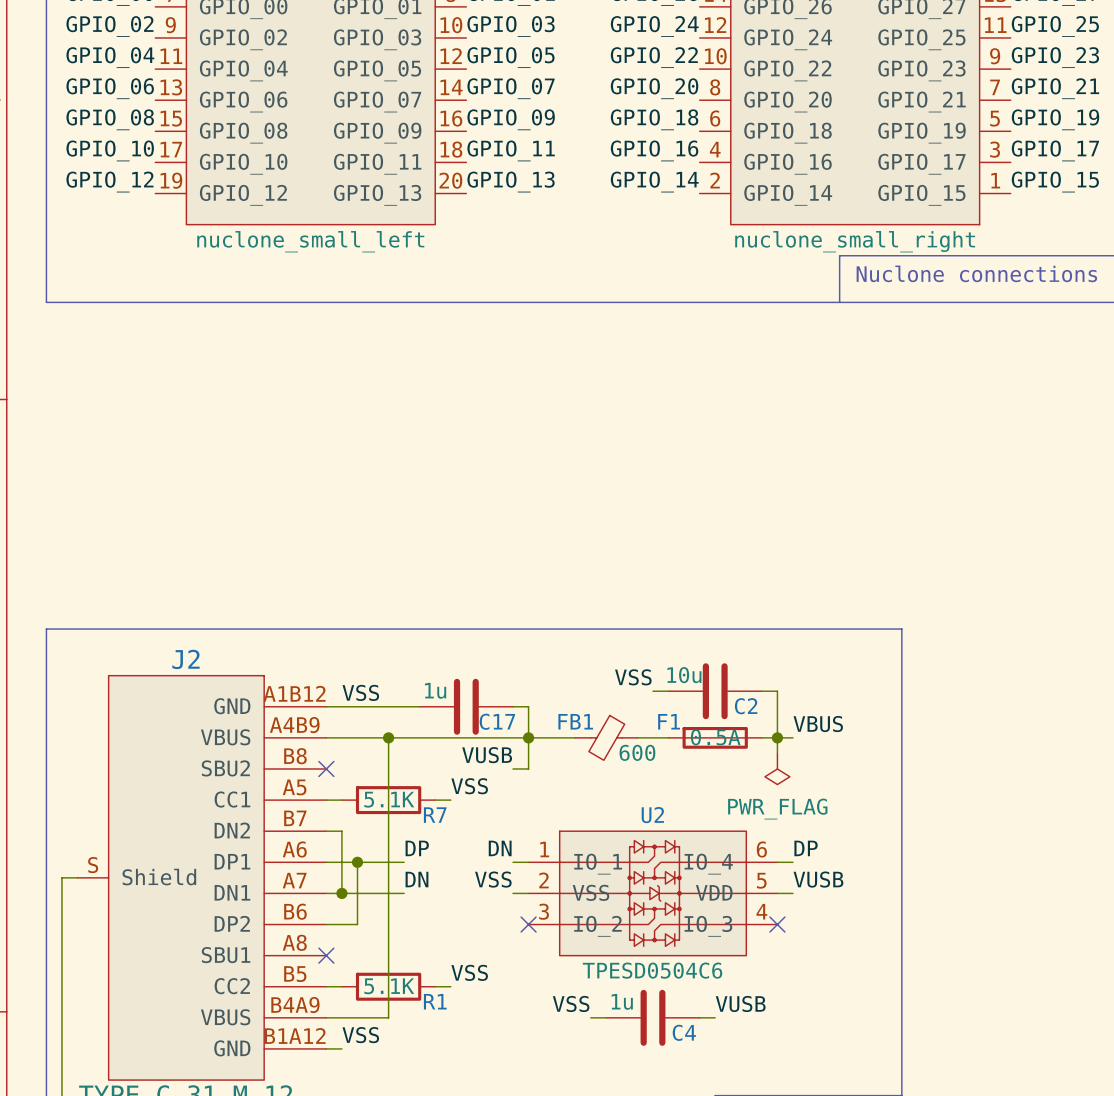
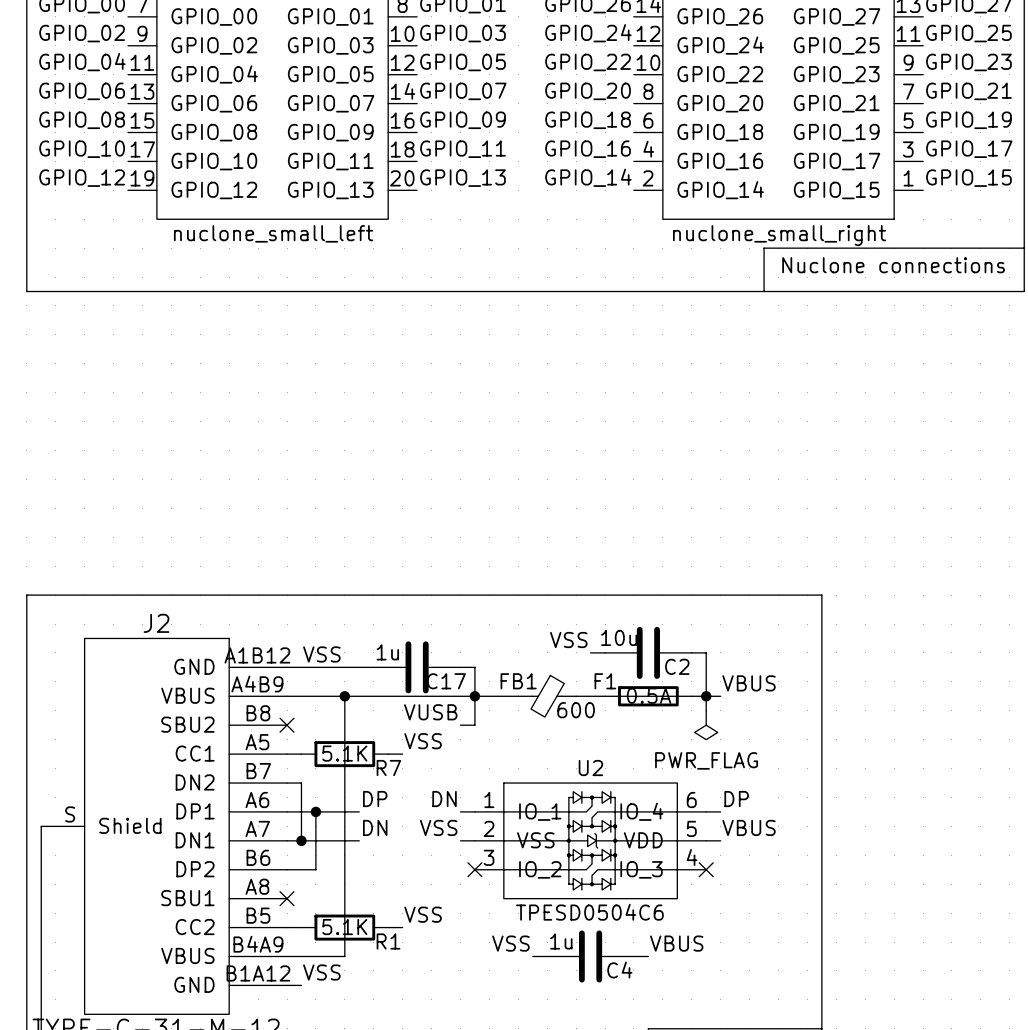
label: VUSB (818, 879) -> VBUS (749, 827)
label: VUSB (740, 1003) -> VBUS (676, 943)

